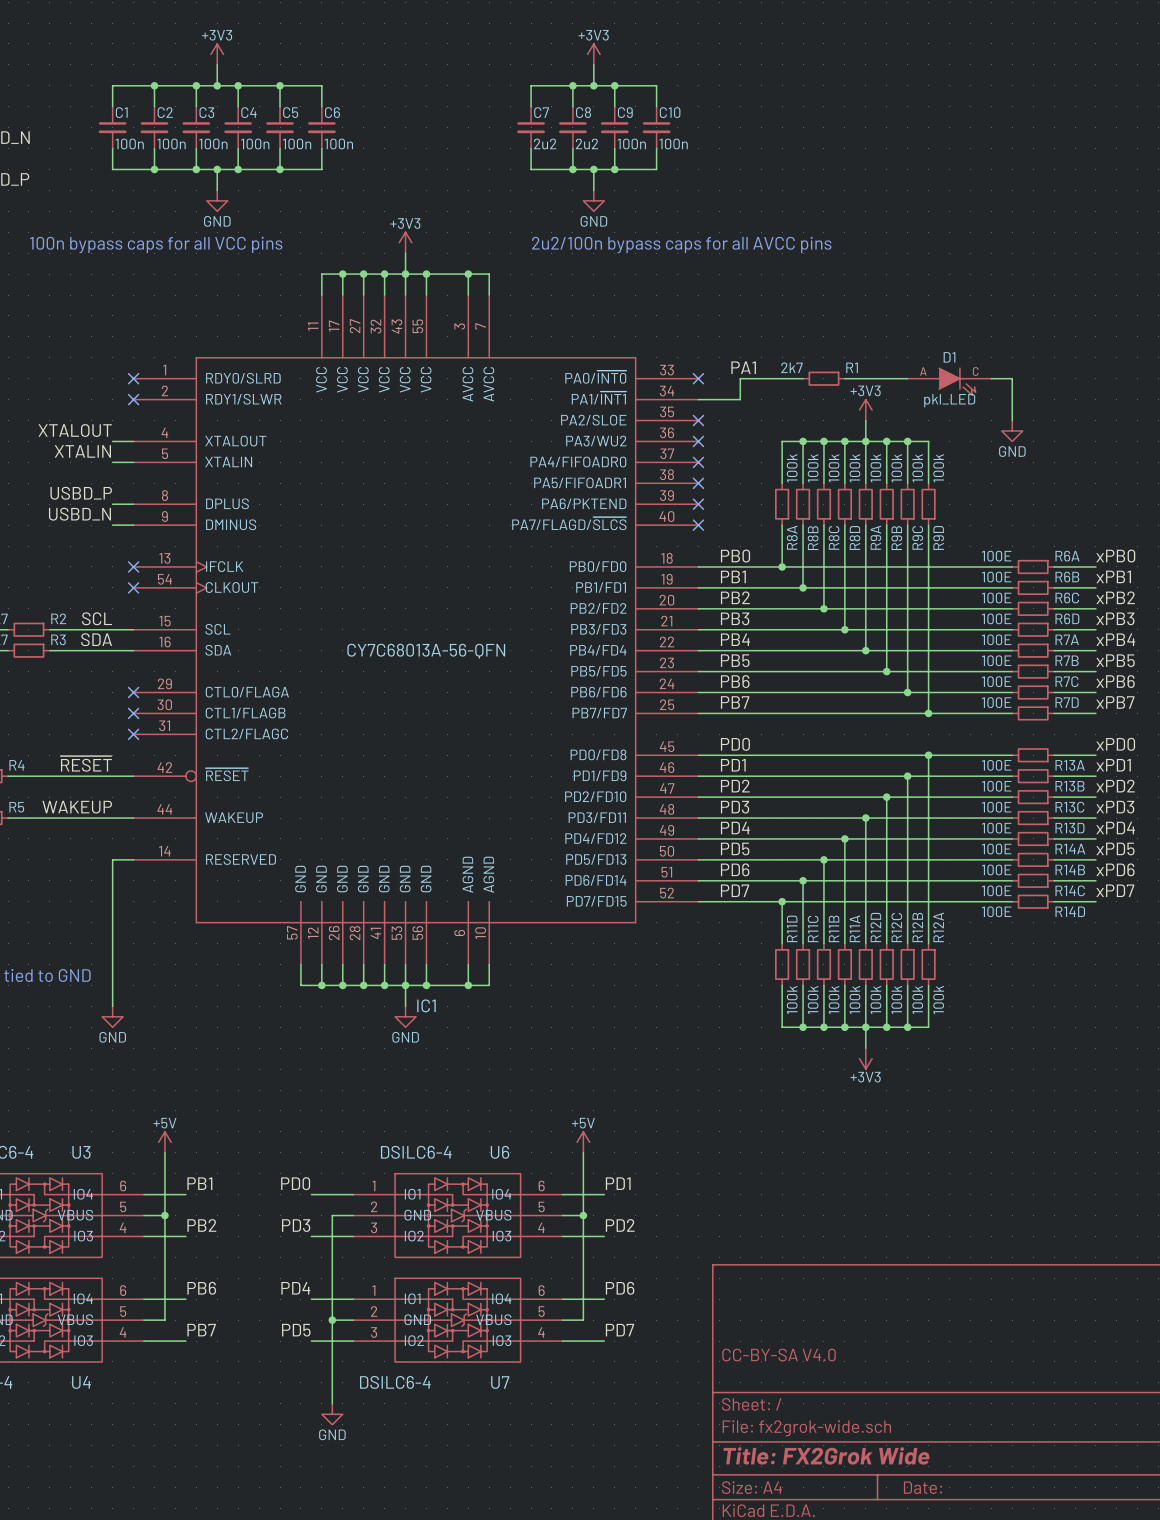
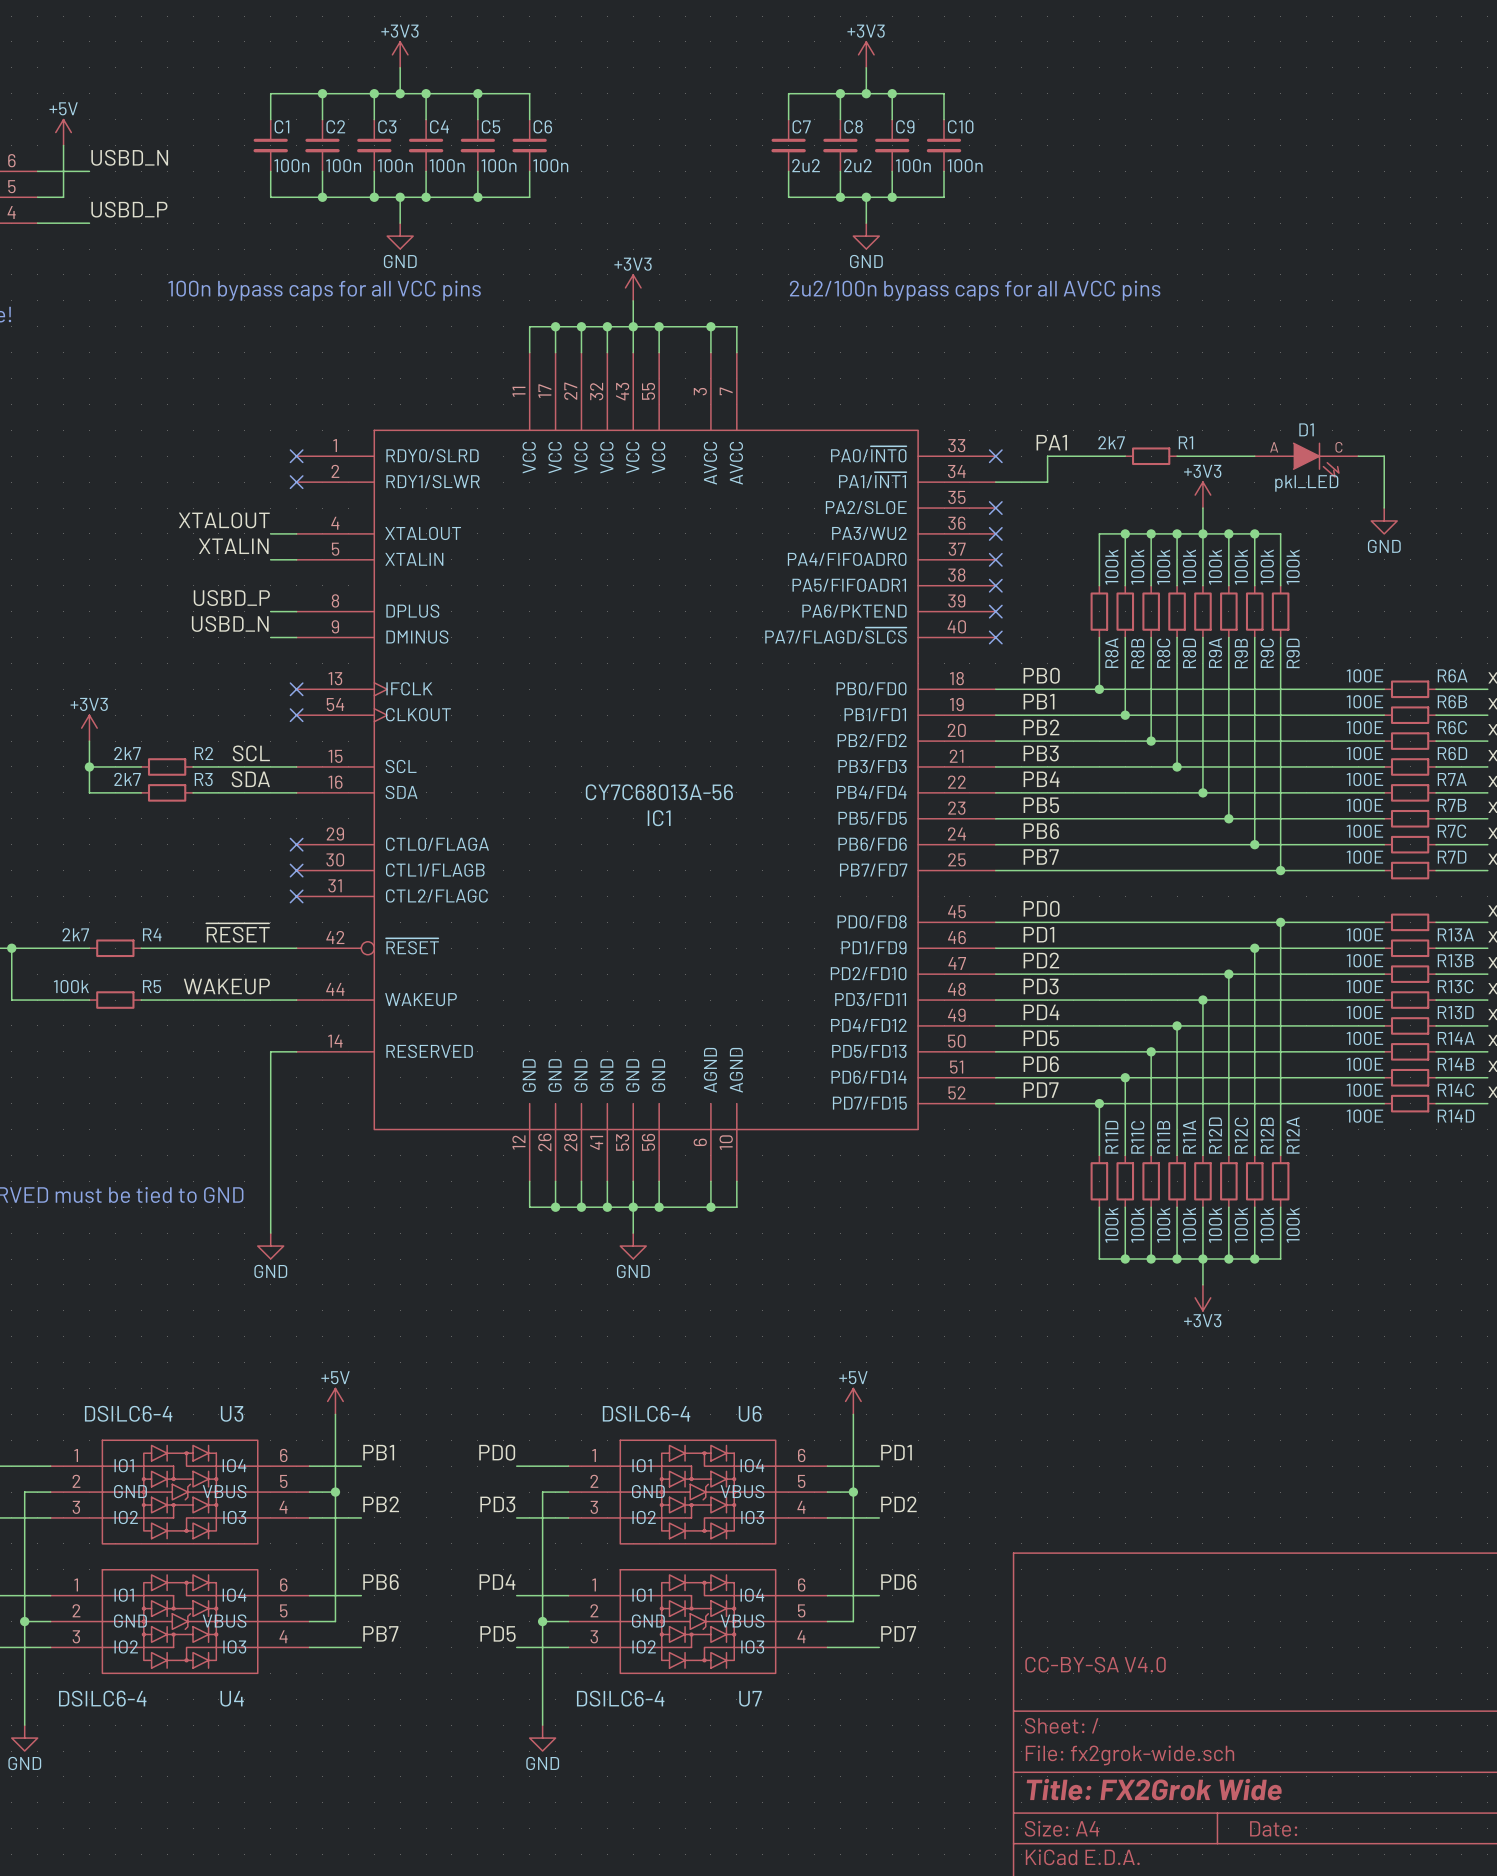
IC1 symbol: [133, 295, 699, 965] -> [296, 352, 996, 1182]
IC1 value: CY7C68013A-56-QFN (426, 651) -> CY7C68013A-56 (659, 792)
wire: (300, 964) (300, 985) (321, 985) -> none
junction: (321, 985) -> none
IC1 name position: IC1 (426, 1005) -> IC1 (659, 818)

